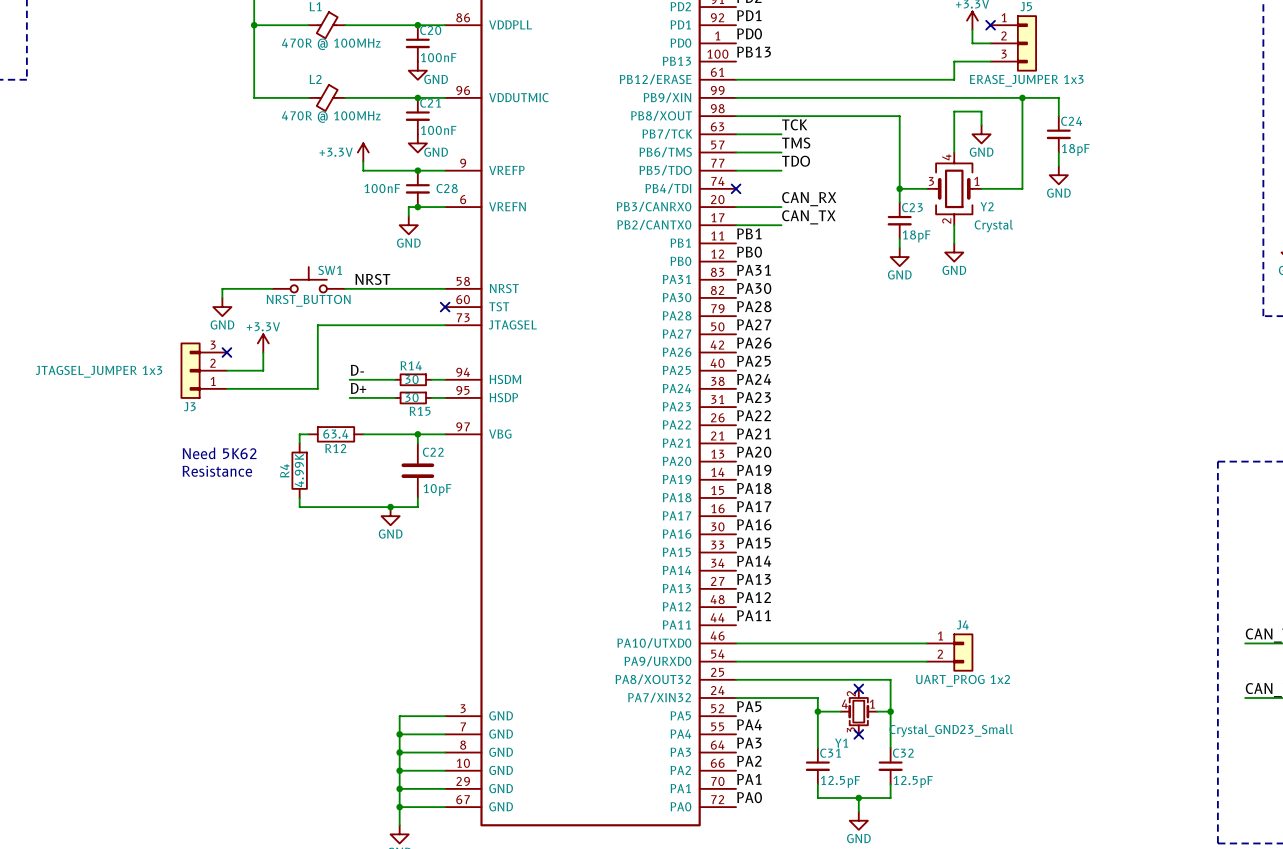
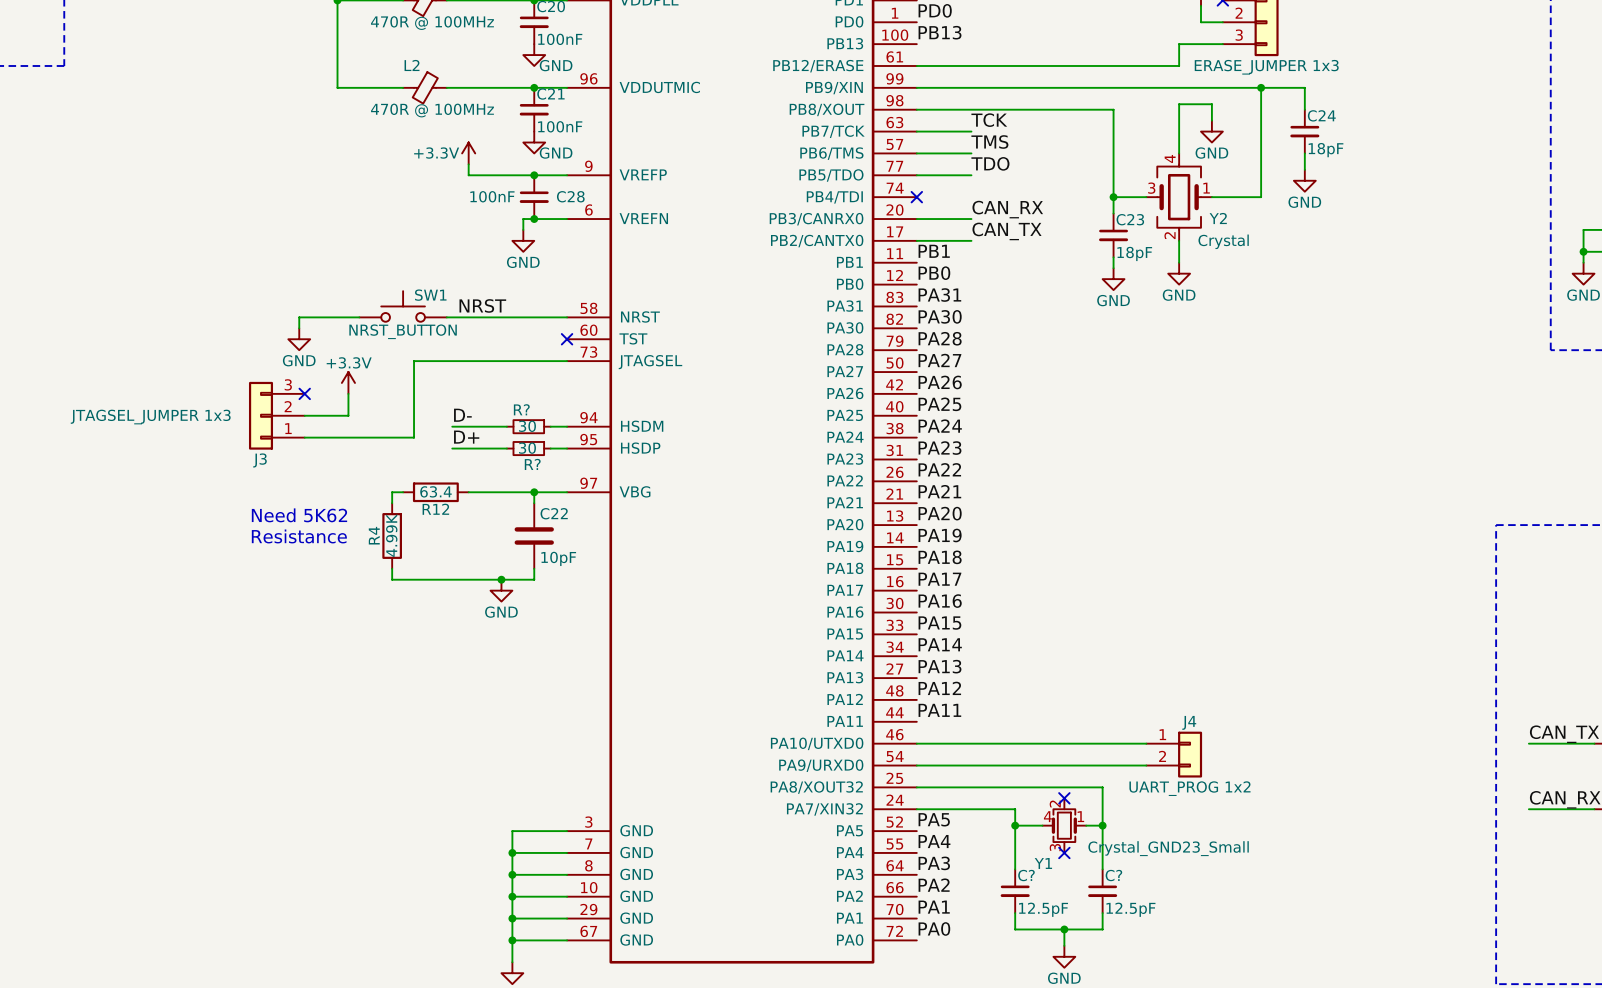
R14 name: R14 (411, 365) -> R? (521, 409)
R15 name: R15 (420, 411) -> R? (532, 464)
C31 name: C31 (830, 753) -> C? (1026, 875)
C32 name: C32 (903, 753) -> C? (1113, 875)

